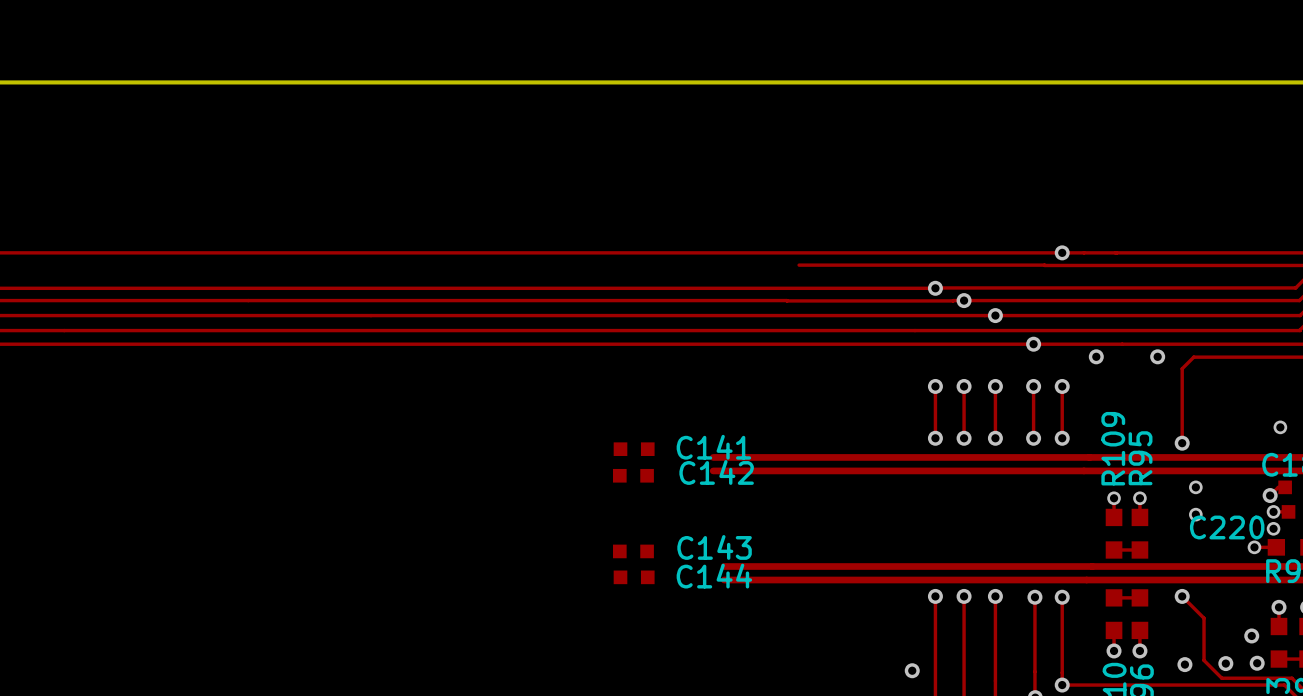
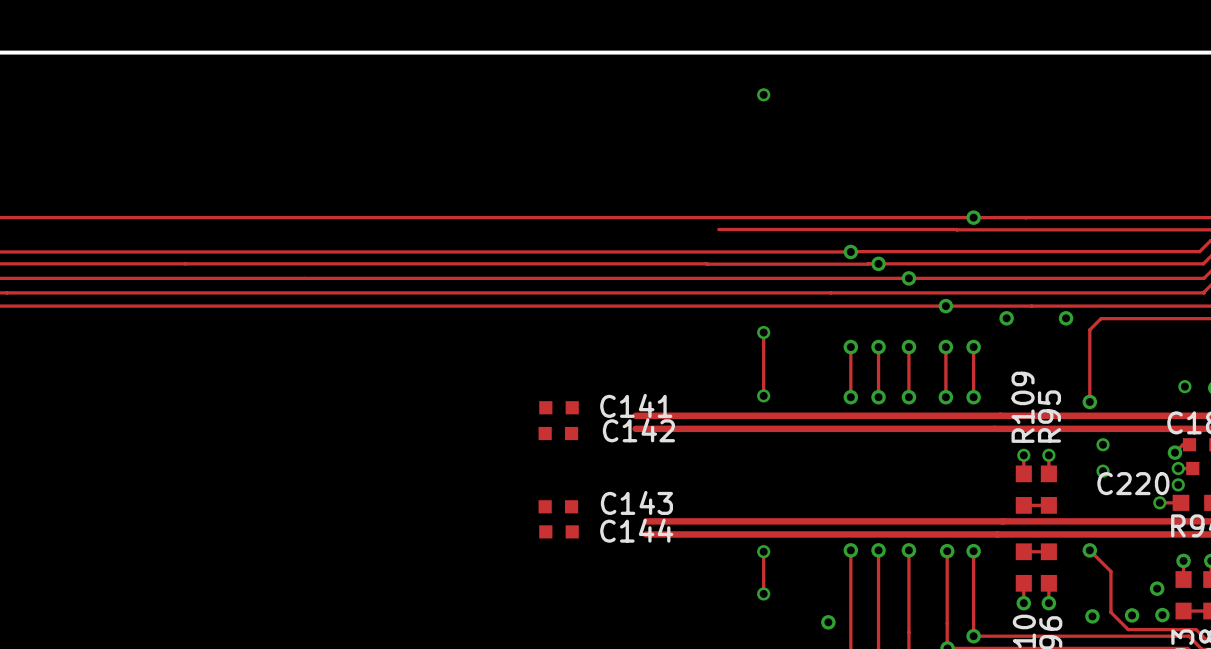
via: none -> (763, 94)
track: none -> (763, 332) (763, 395)
via: none -> (763, 332)
via: none -> (763, 395)
track: none -> (763, 551) (763, 593)
via: none -> (763, 551)
via: none -> (763, 593)

